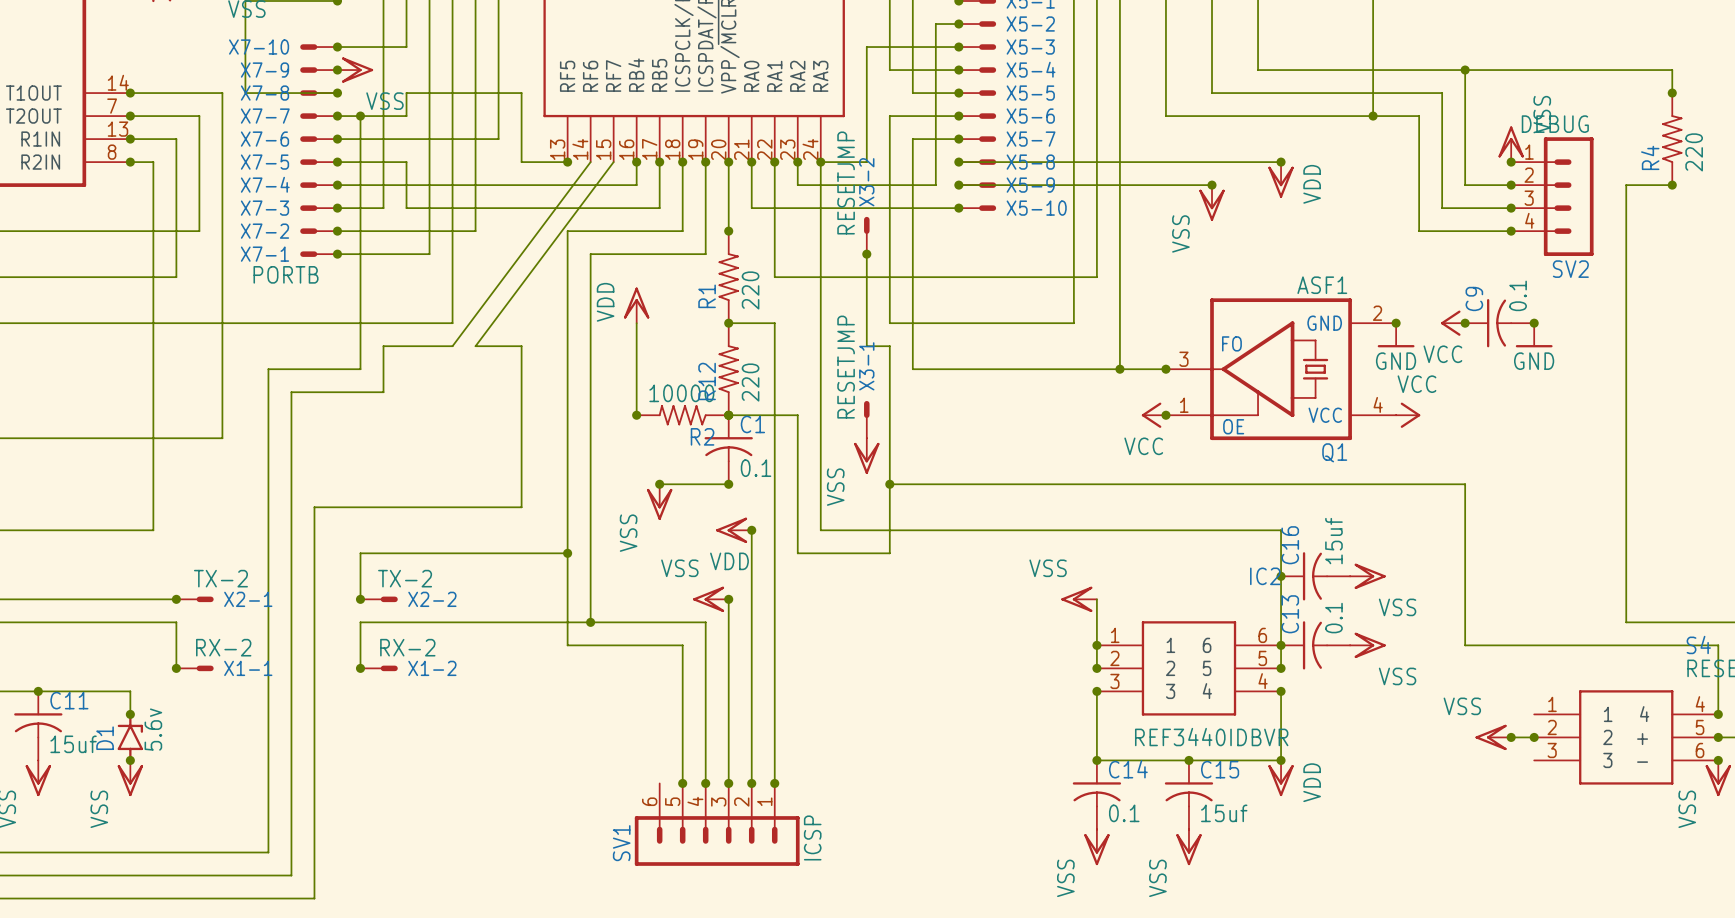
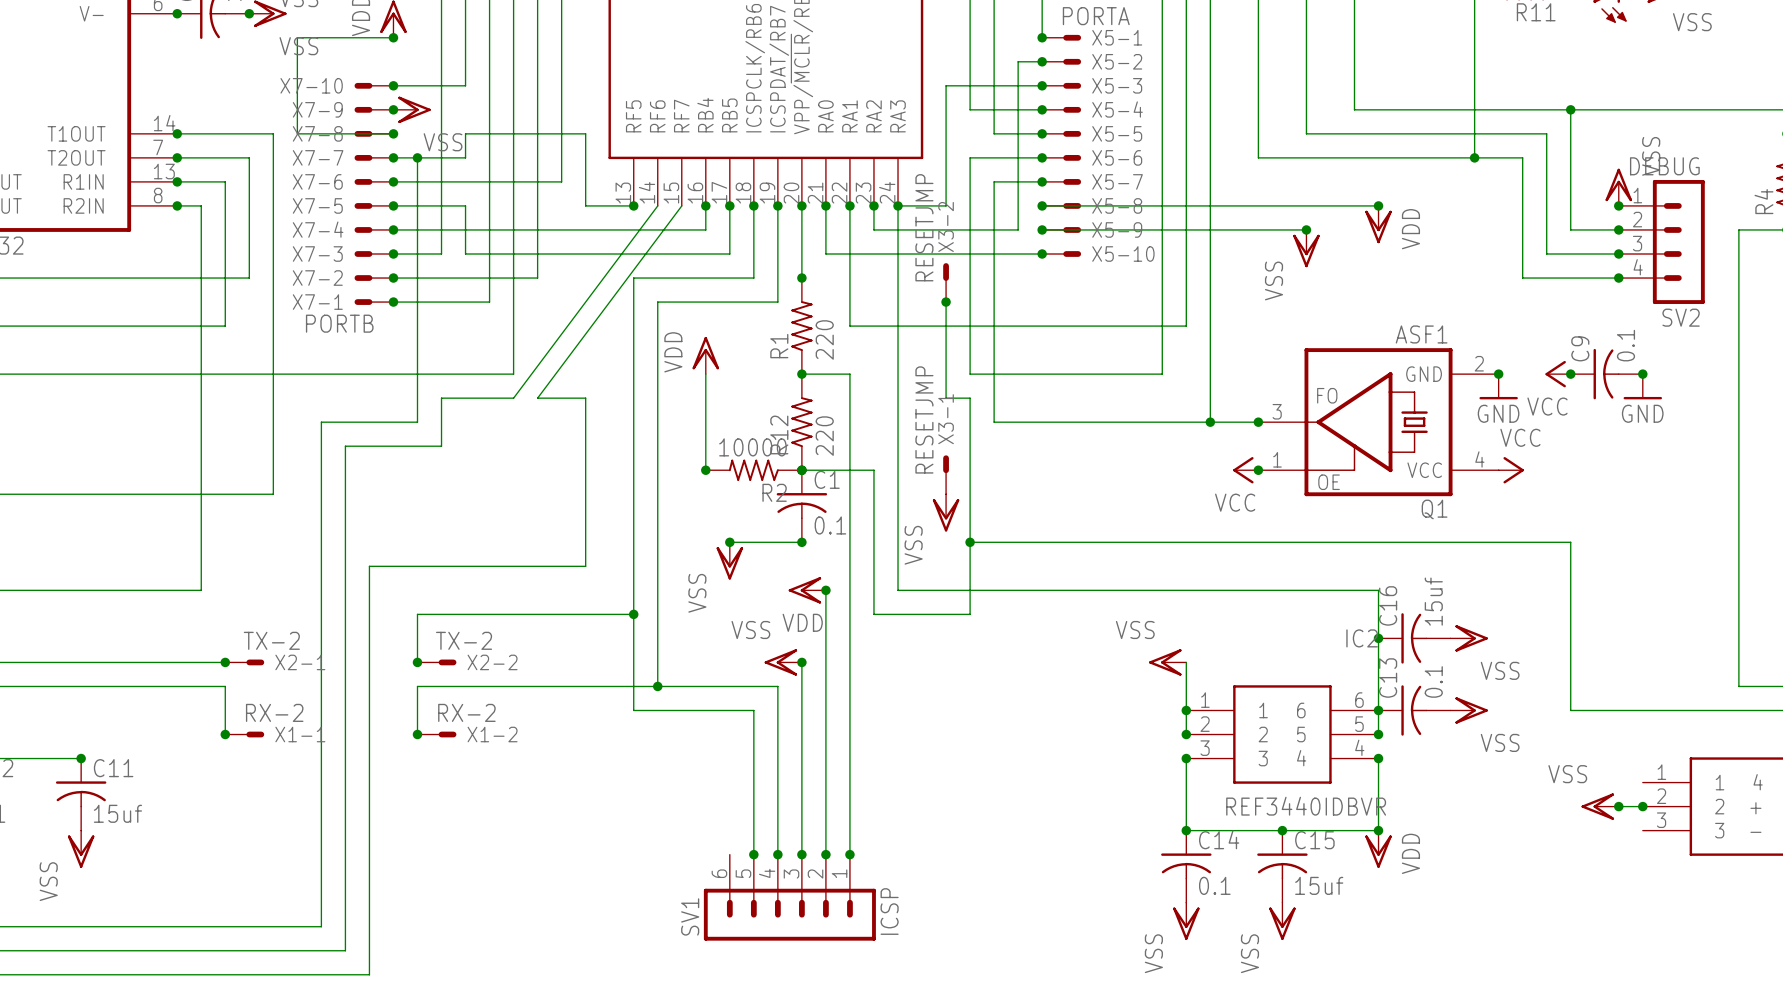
wire: (38, 691) (130, 691) (130, 714) -> none
junction: (130, 714) -> none
D1: 5.6v (130, 737) -> none
junction: (130, 760) -> none
power symbol: VSS (130, 778) -> none

